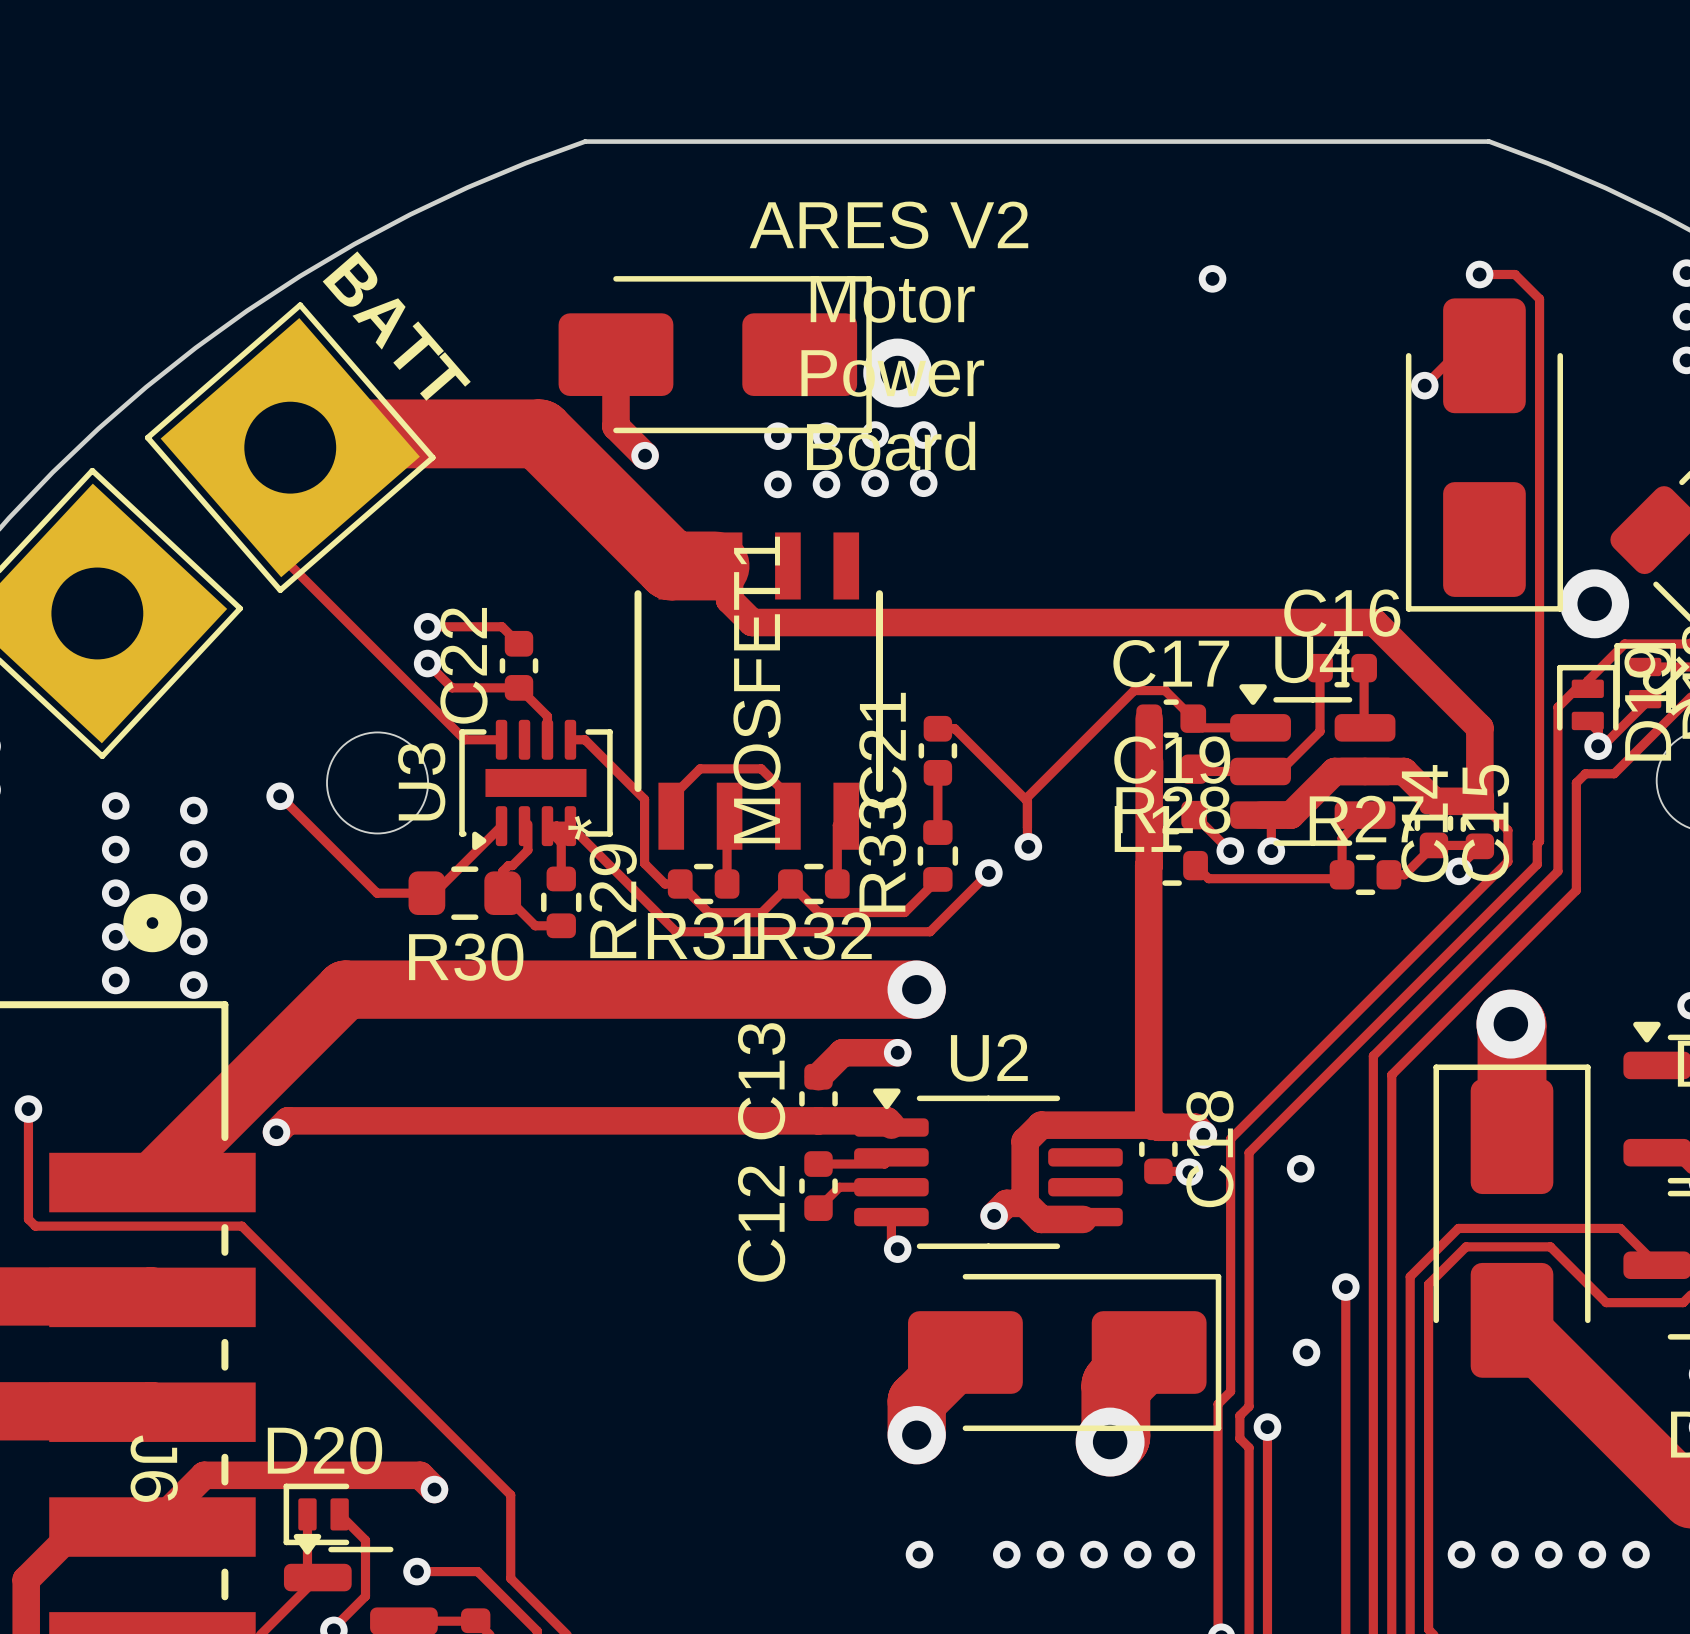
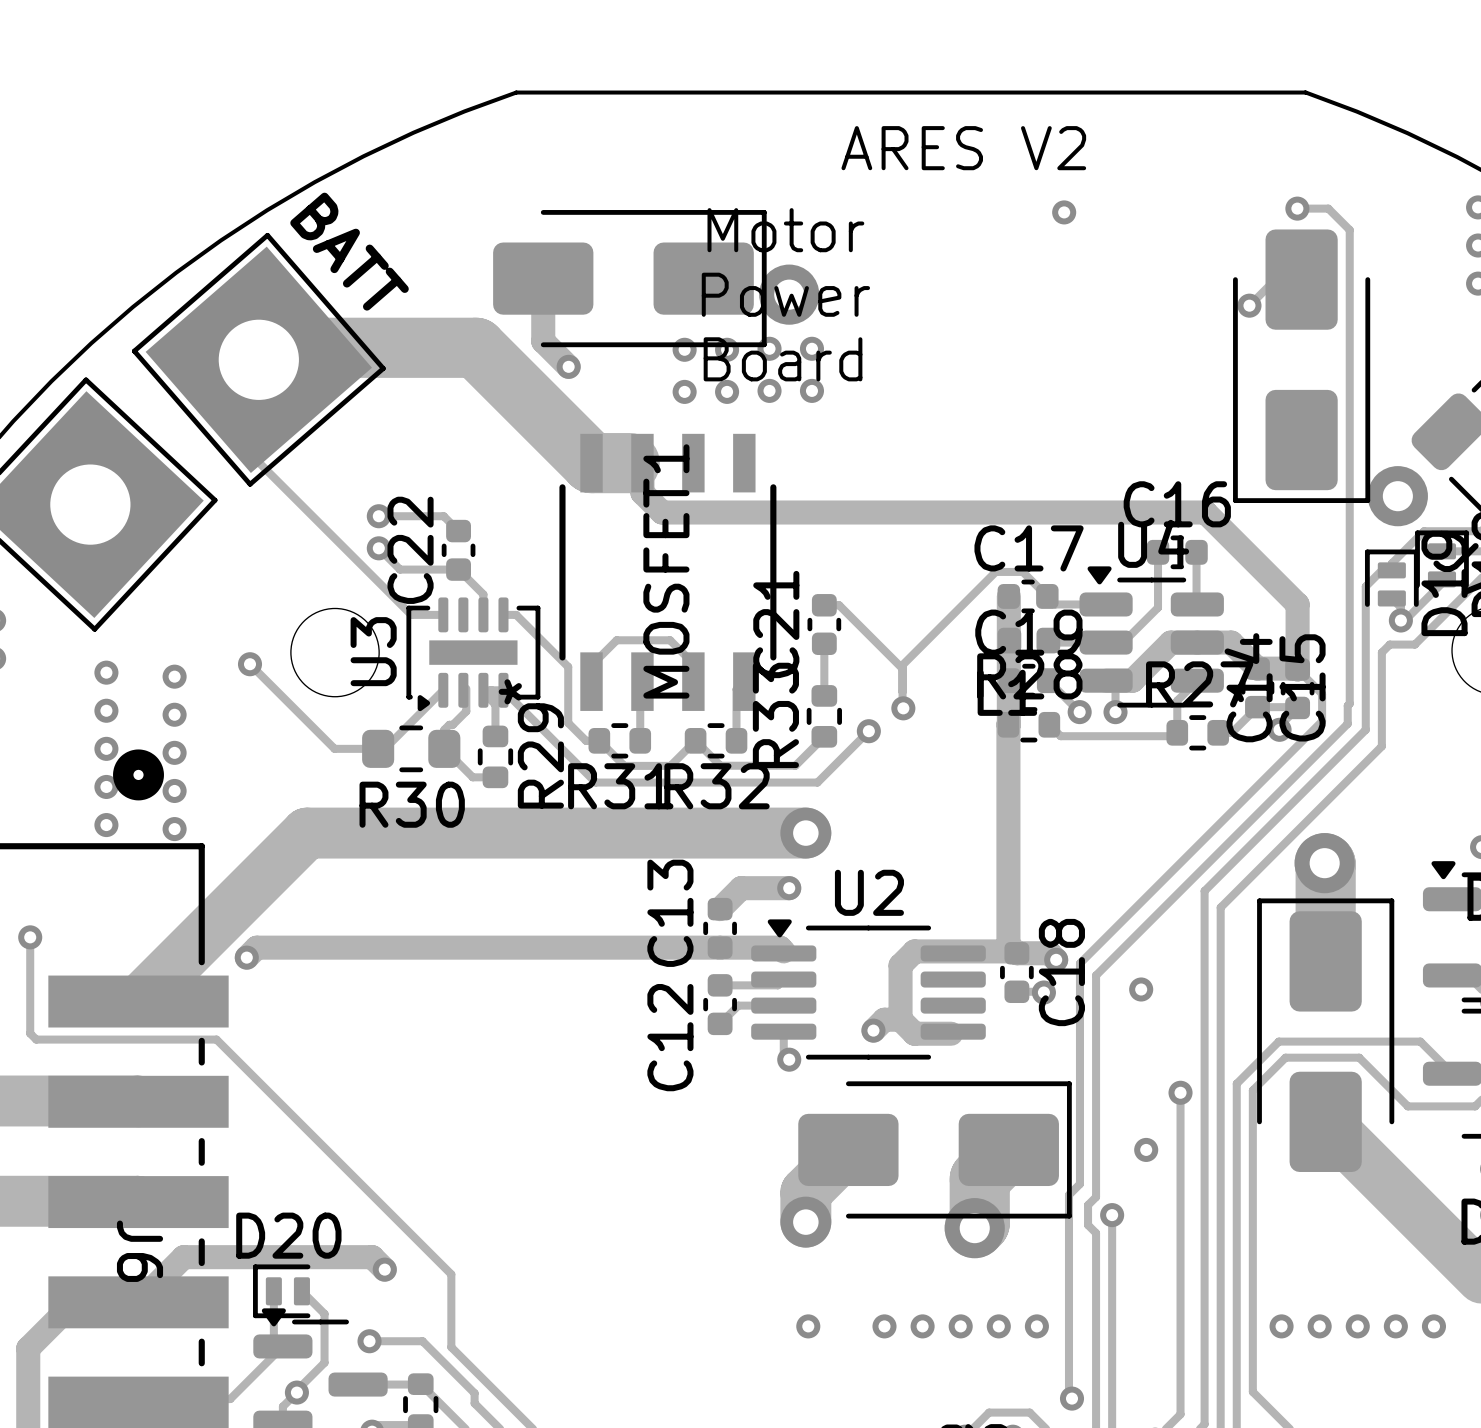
text position: ARES V2 (888, 225) -> ARES V2 (963, 148)

